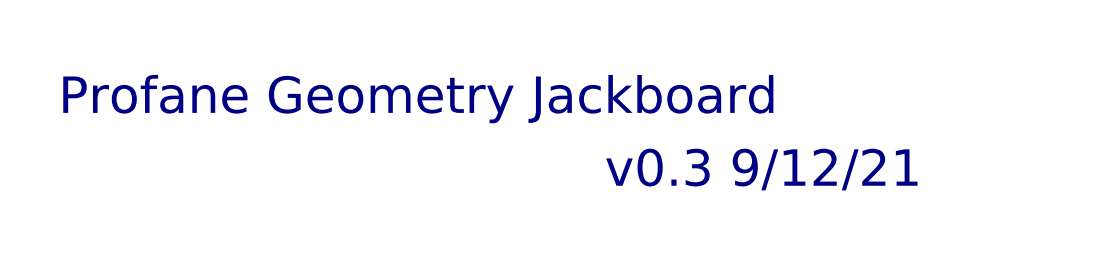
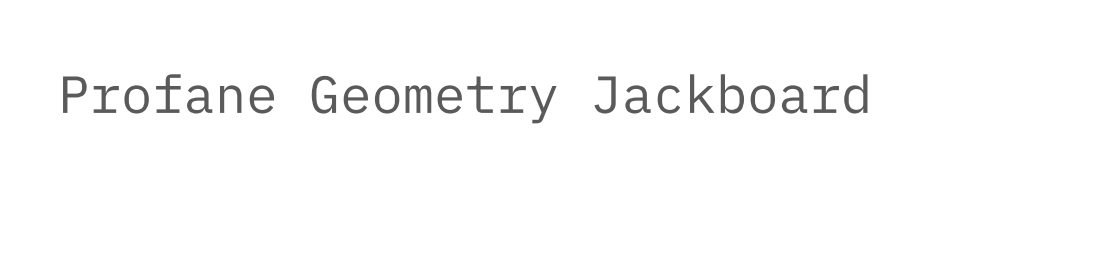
text: v0.3 9/12/21 (761, 169) -> none

